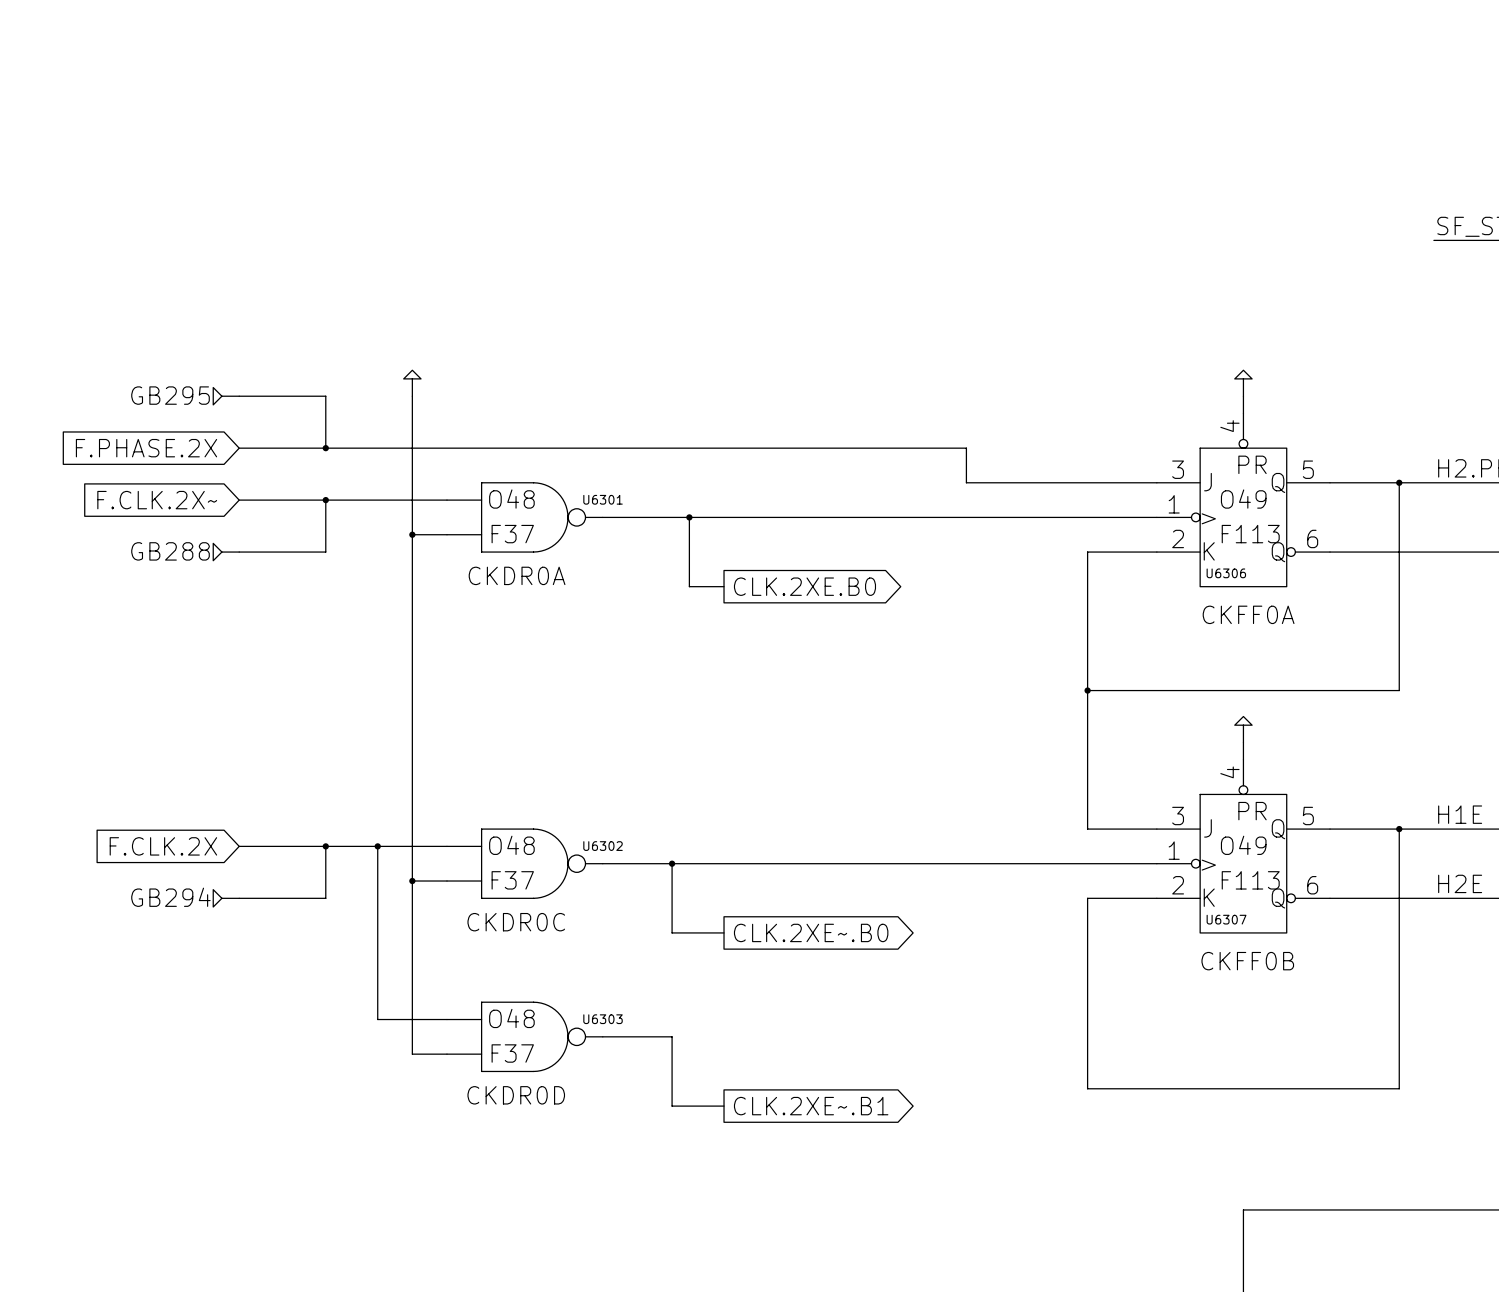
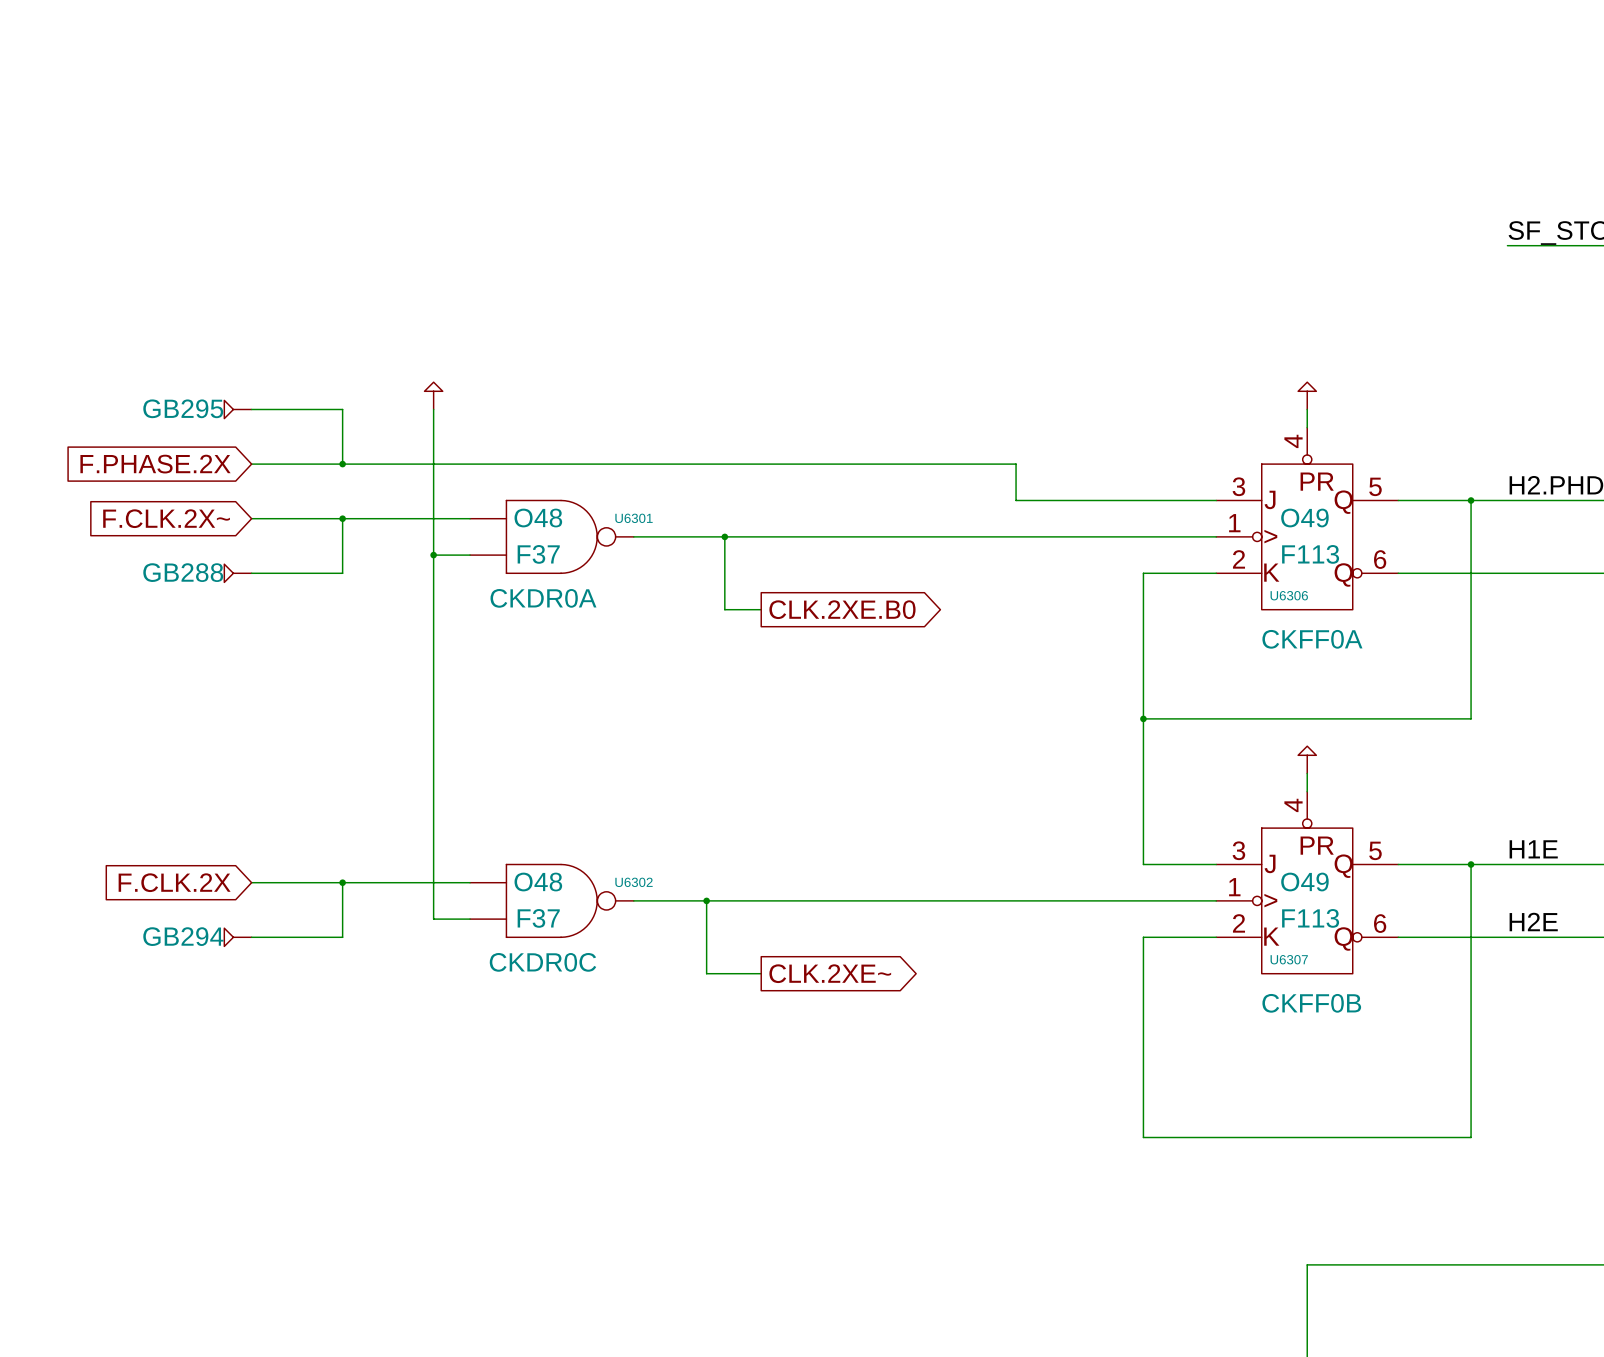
wire: (377, 846) (377, 1019) (446, 1019) -> none
junction: (377, 846) -> none
wire: (412, 881) (412, 1054) (446, 1054) -> none
junction: (412, 881) -> none
global label: CLK.2XE~.B0 (811, 932) -> CLK.2XE~ (830, 973)
U6303: F37 (524, 1036) -> none
wire: (602, 1036) (672, 1036) (672, 1106) (724, 1106) -> none
global label: CLK.2XE~.B1 (811, 1106) -> none

